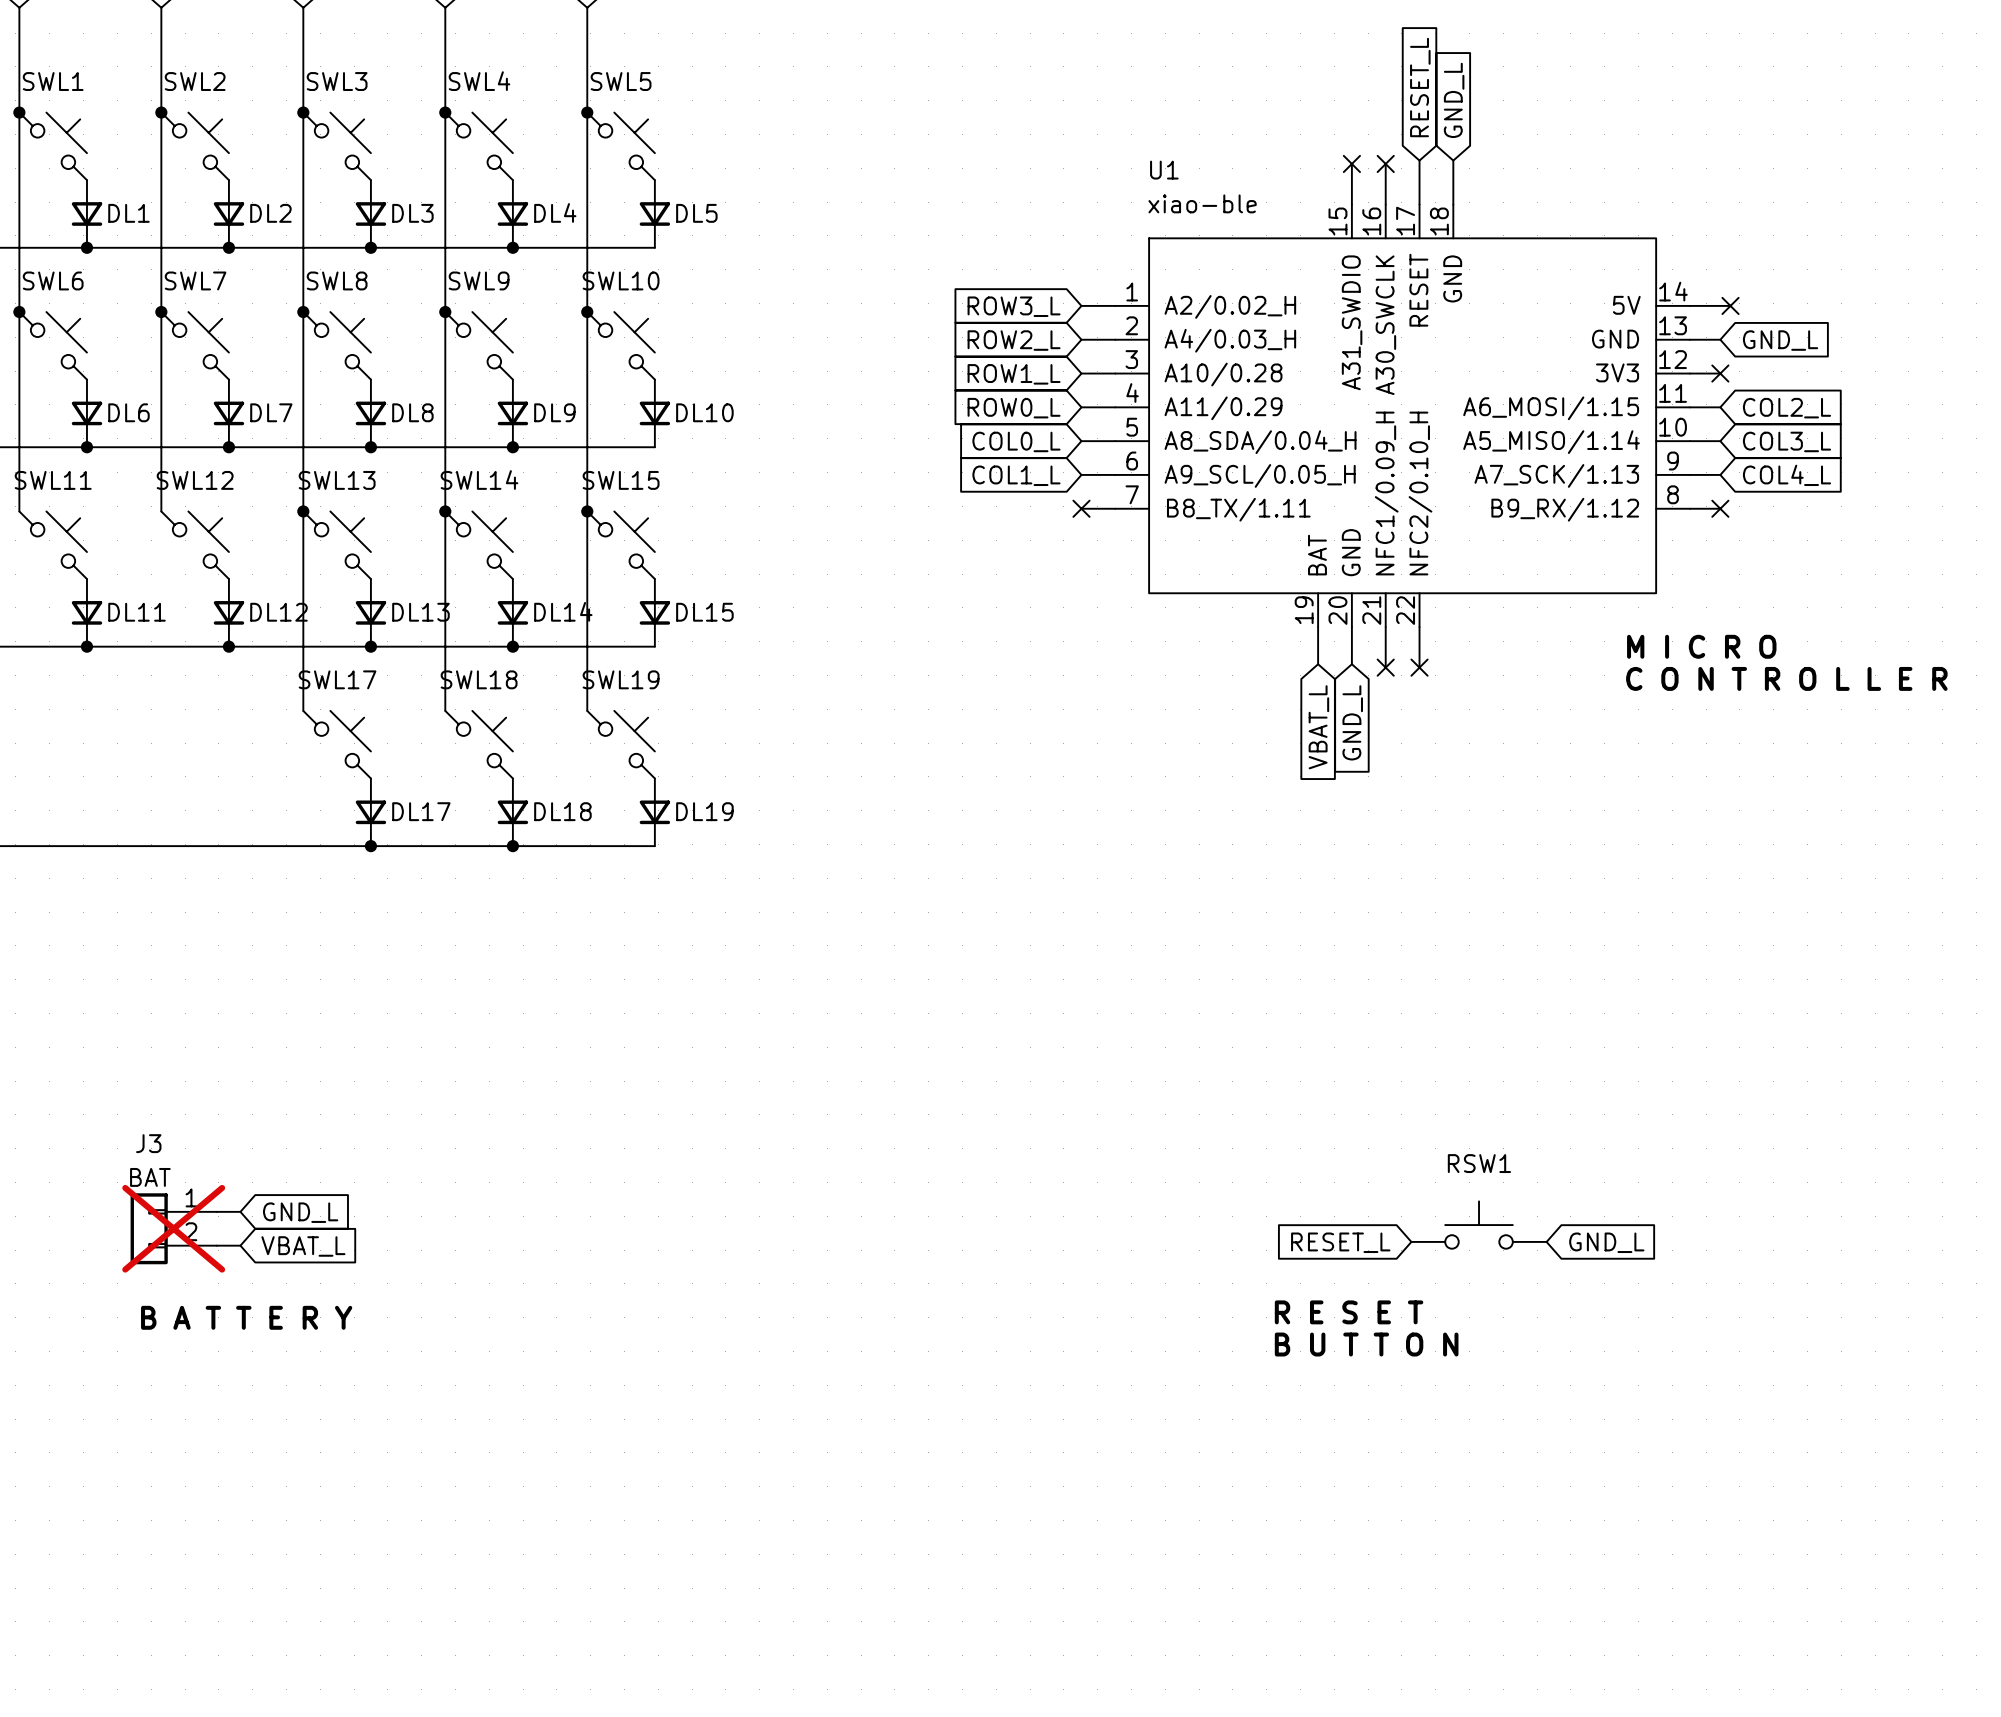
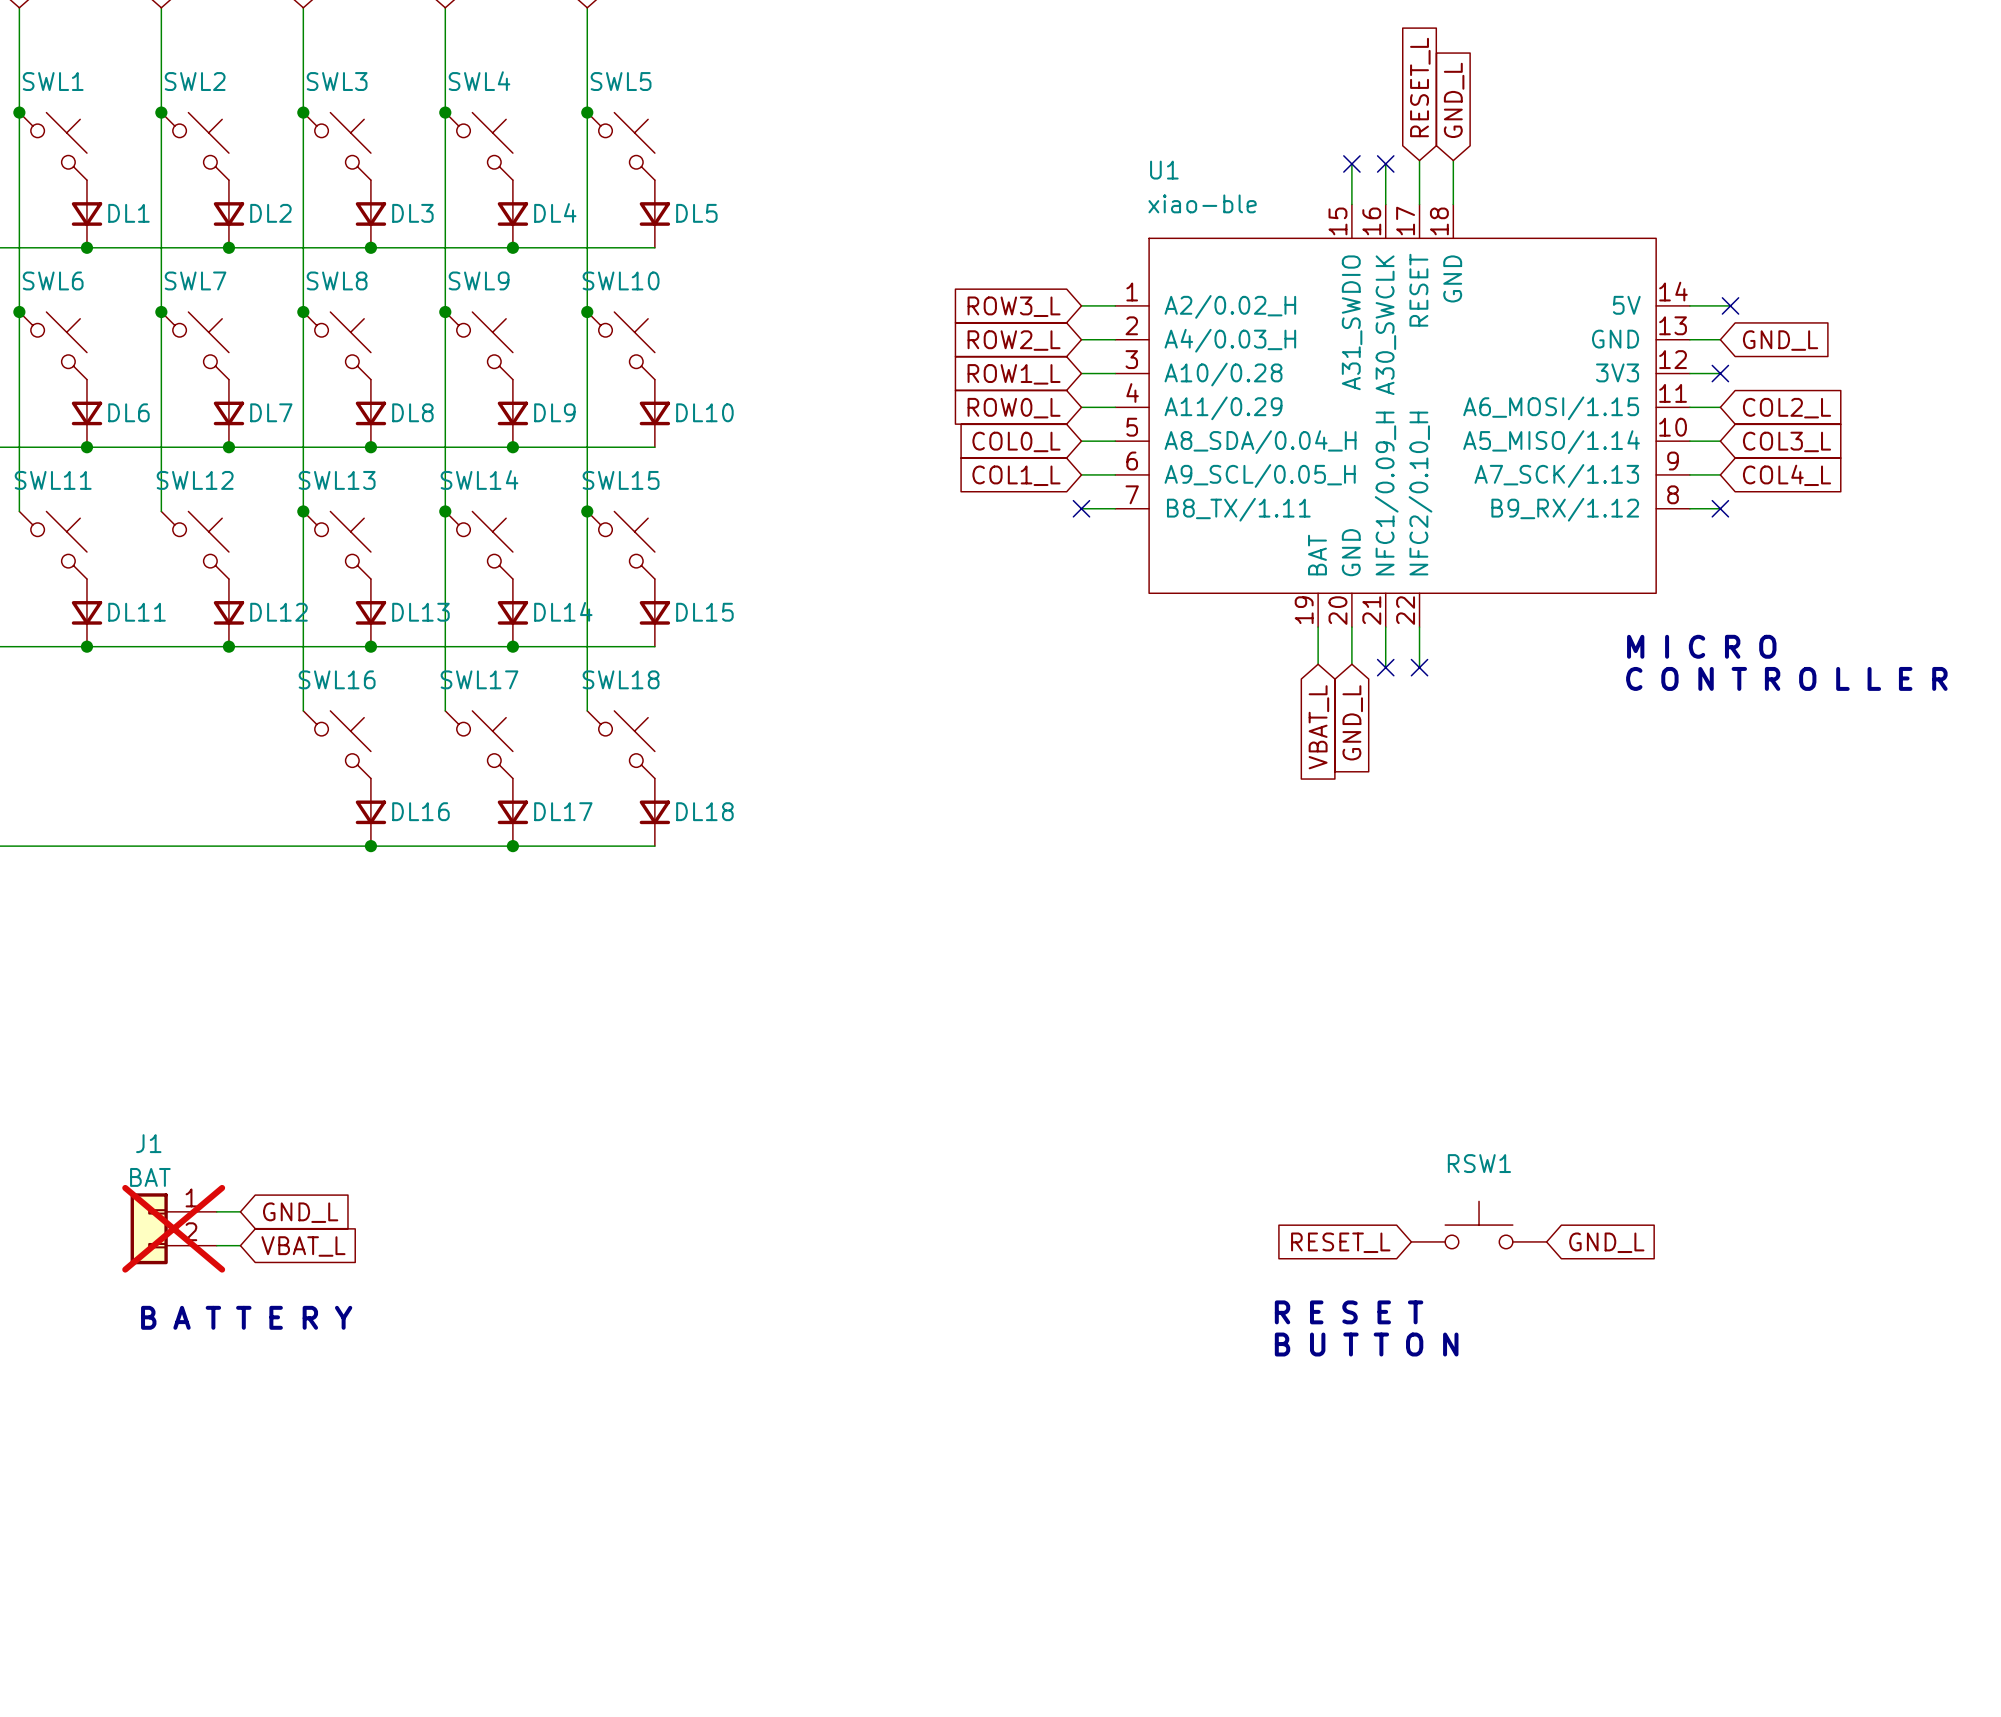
SWL17 name: SWL17 (337, 679) -> SWL16 (337, 679)
SWL18 name: SWL18 (479, 679) -> SWL17 (479, 679)
SWL19 name: SWL19 (621, 679) -> SWL18 (621, 679)
DL17 name: DL17 (421, 811) -> DL16 (420, 811)
DL18 name: DL18 (562, 811) -> DL17 (563, 811)
DL19 name: DL19 (704, 811) -> DL18 (704, 811)
J3 name: J3 (148, 1143) -> J1 (148, 1143)

